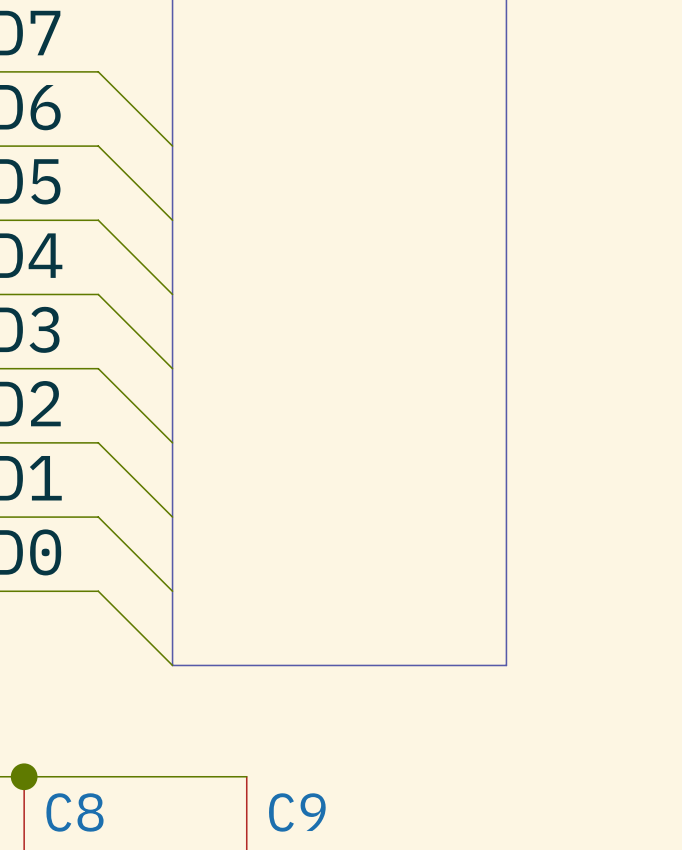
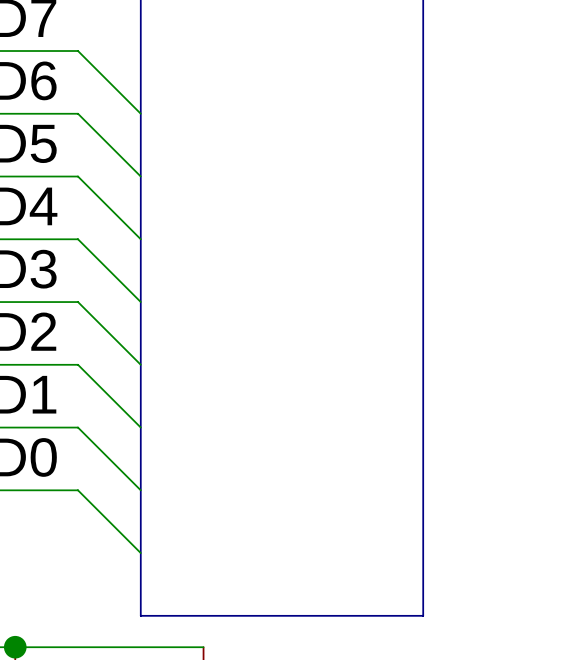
bus: (172, 665) (506, 665) -> (140, 553) (140, 615) (423, 615) (423, 553)

